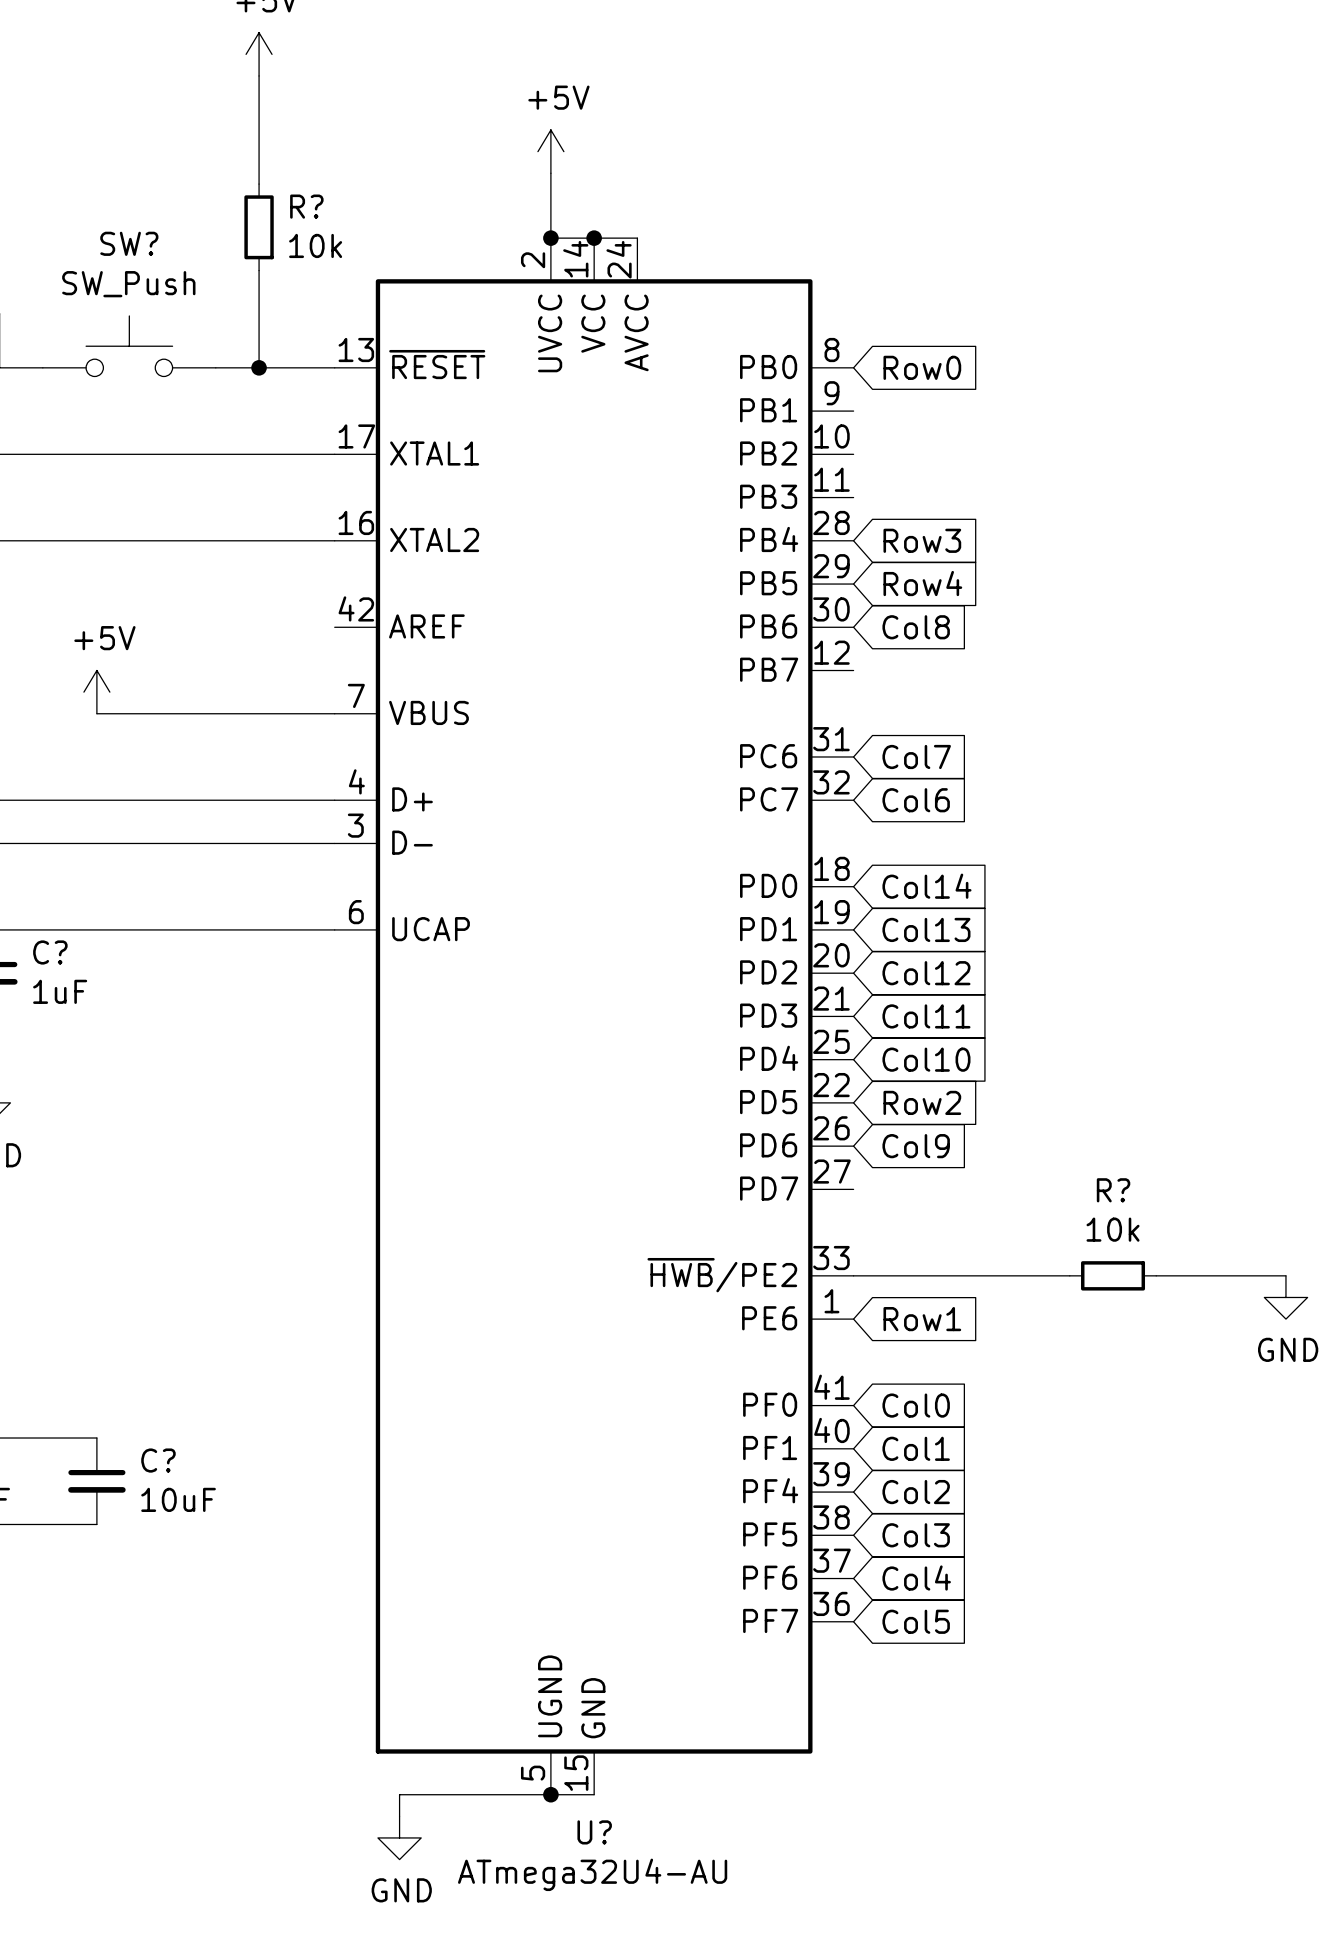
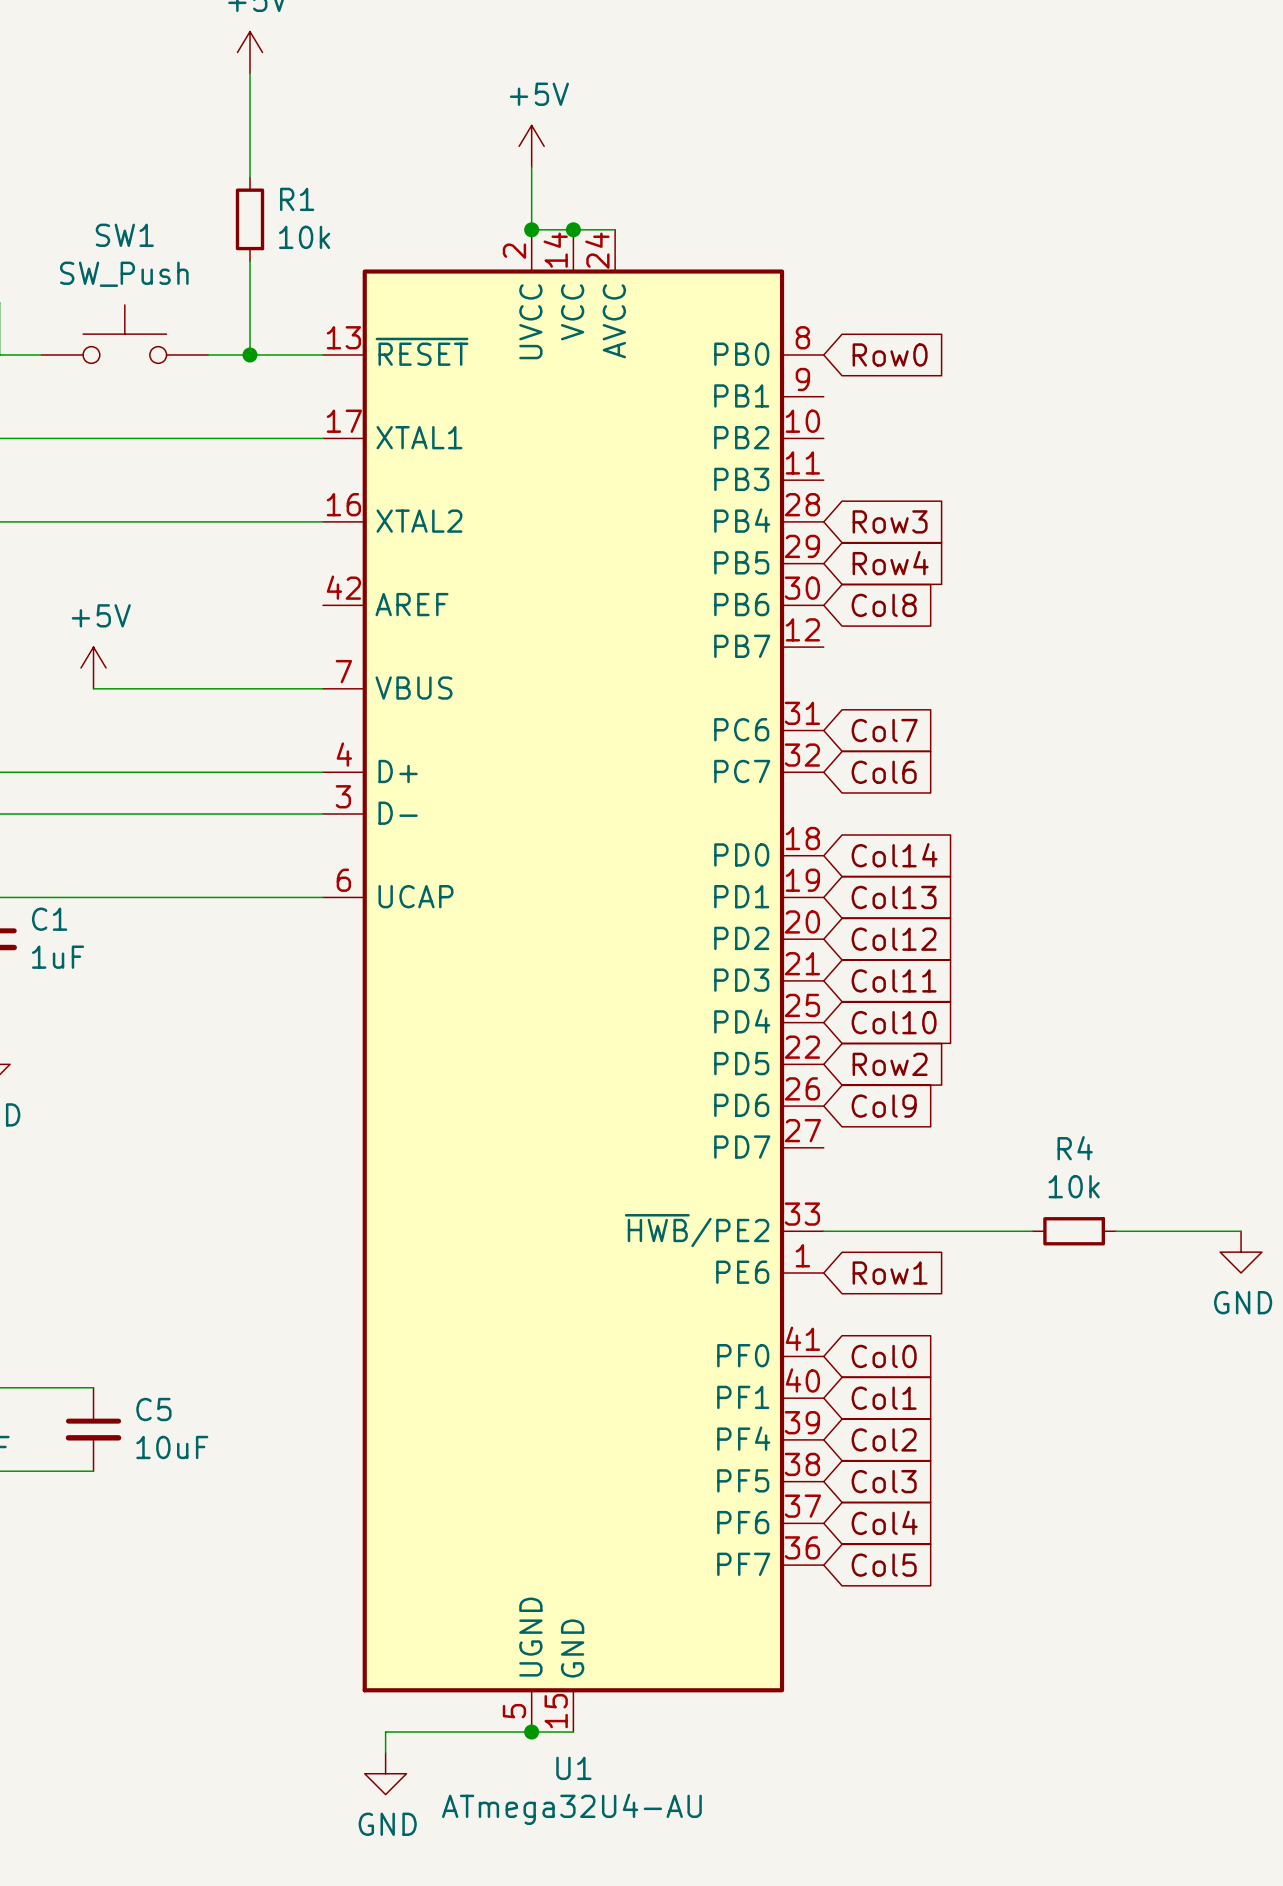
R? name: R? (306, 206) -> R1 (297, 199)
SW? name: SW? (129, 243) -> SW1 (124, 235)
C? name: C? (50, 952) -> C1 (49, 919)
R? name: R? (1113, 1190) -> R4 (1075, 1148)
C? name: C? (158, 1460) -> C5 (153, 1409)
U? name: U? (594, 1832) -> U1 (573, 1768)

